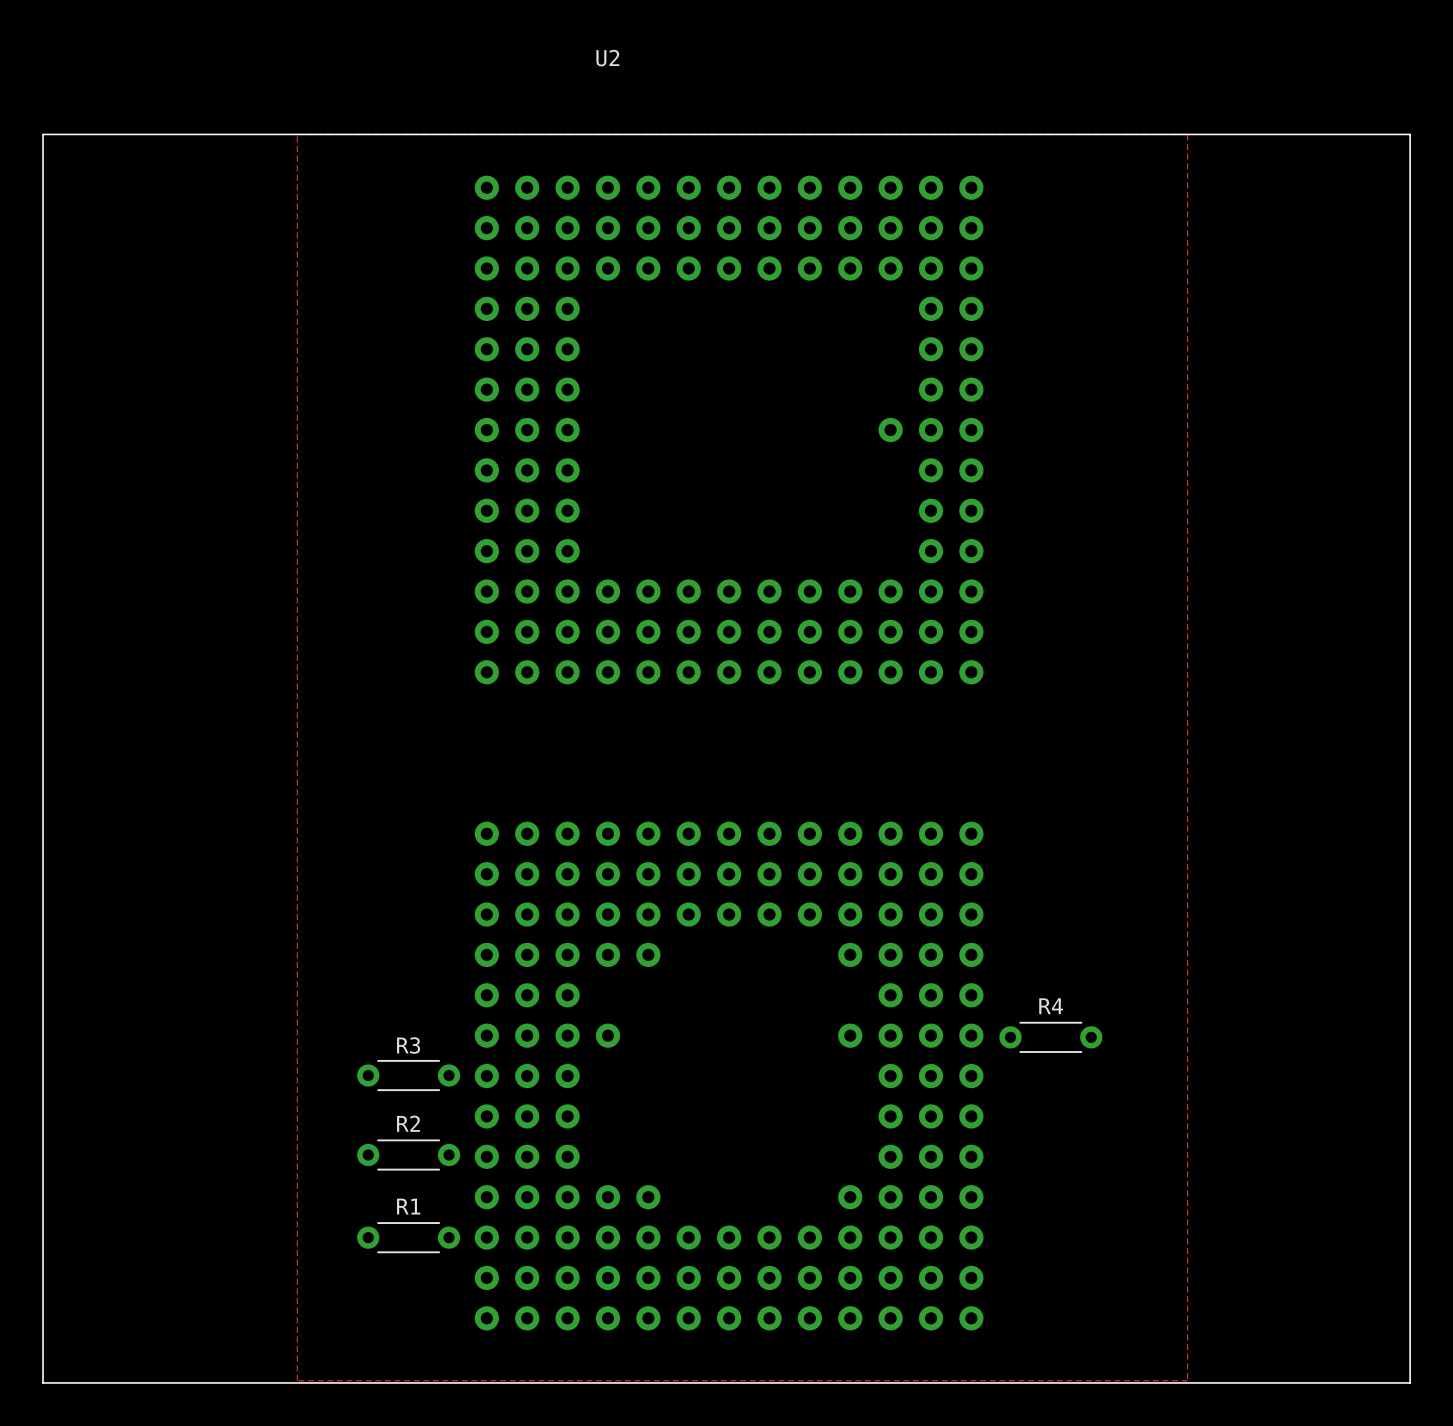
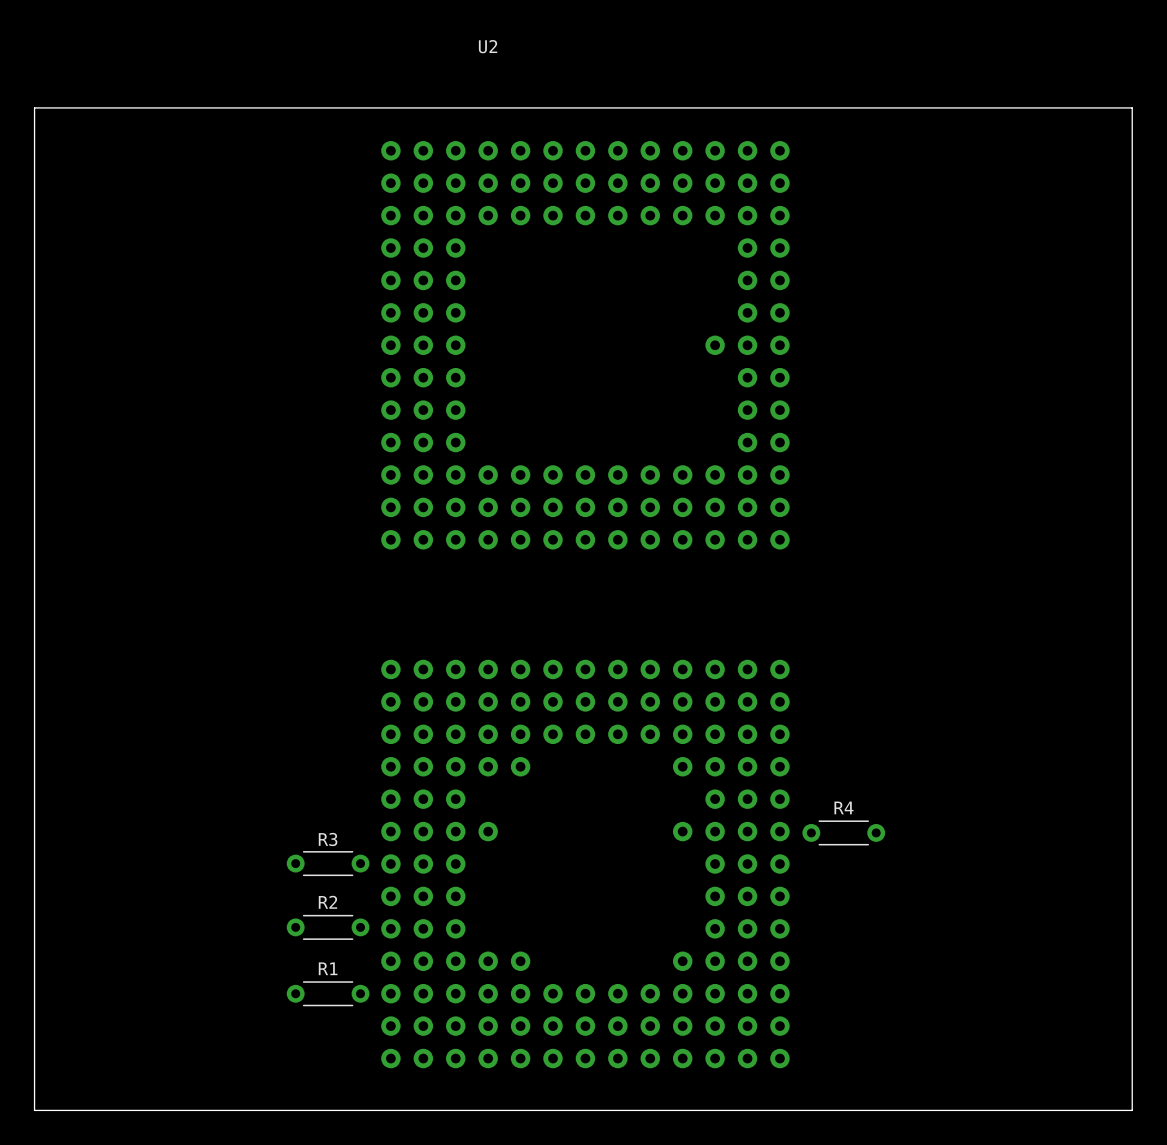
zone outline: (297, 134) (1187, 134) (1187, 1380) (297, 1380) (297, 134) -> none

